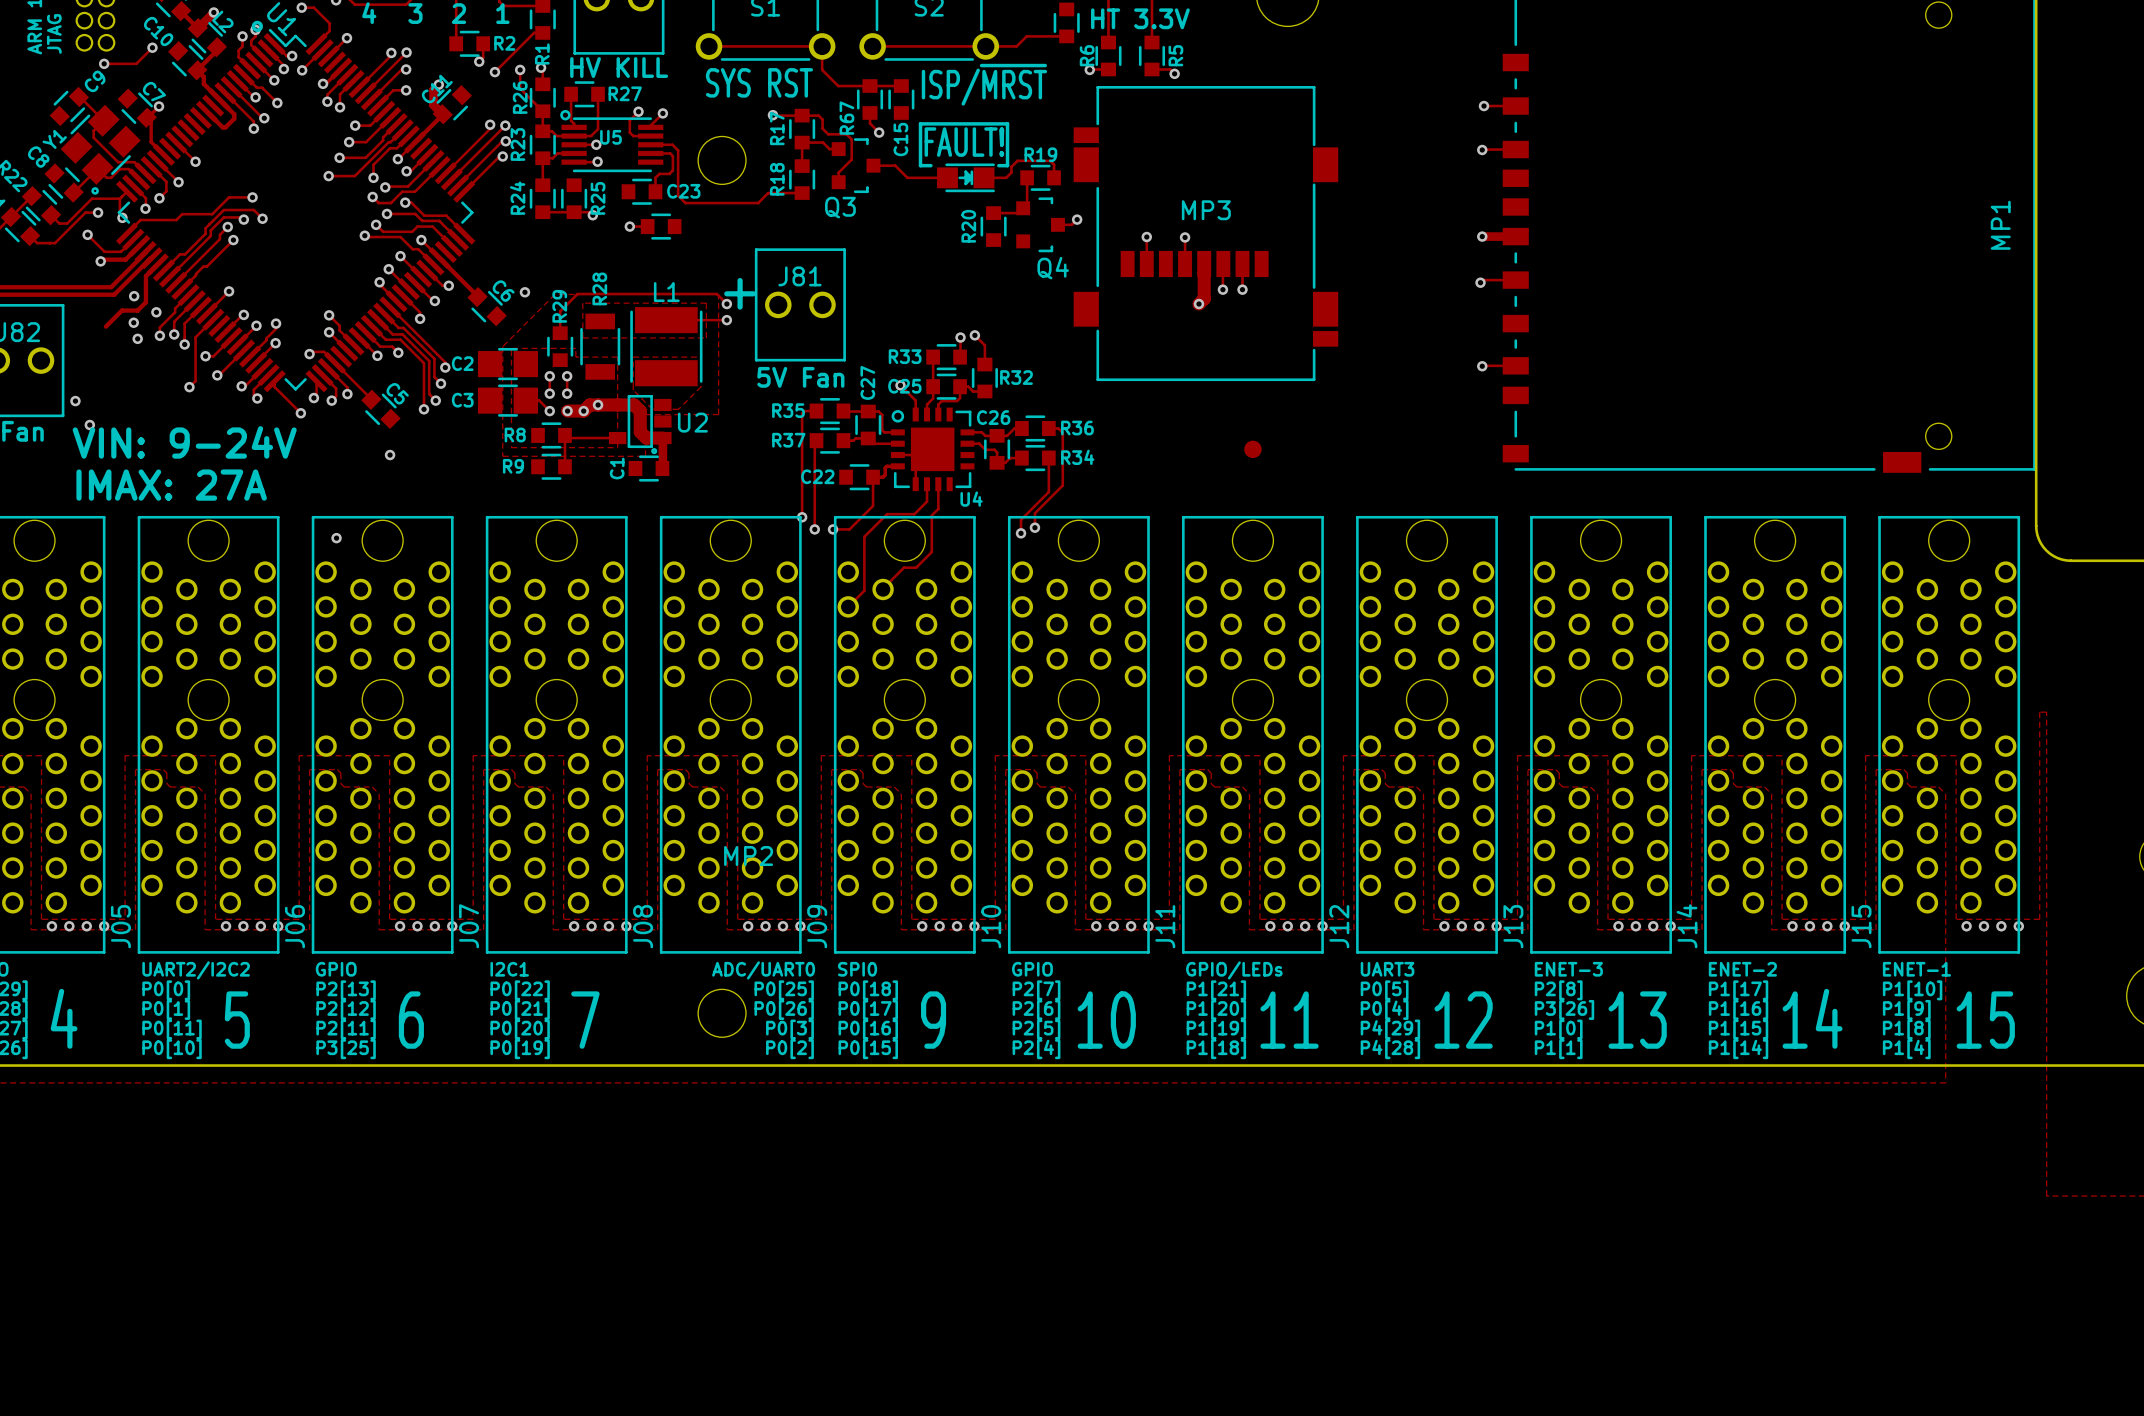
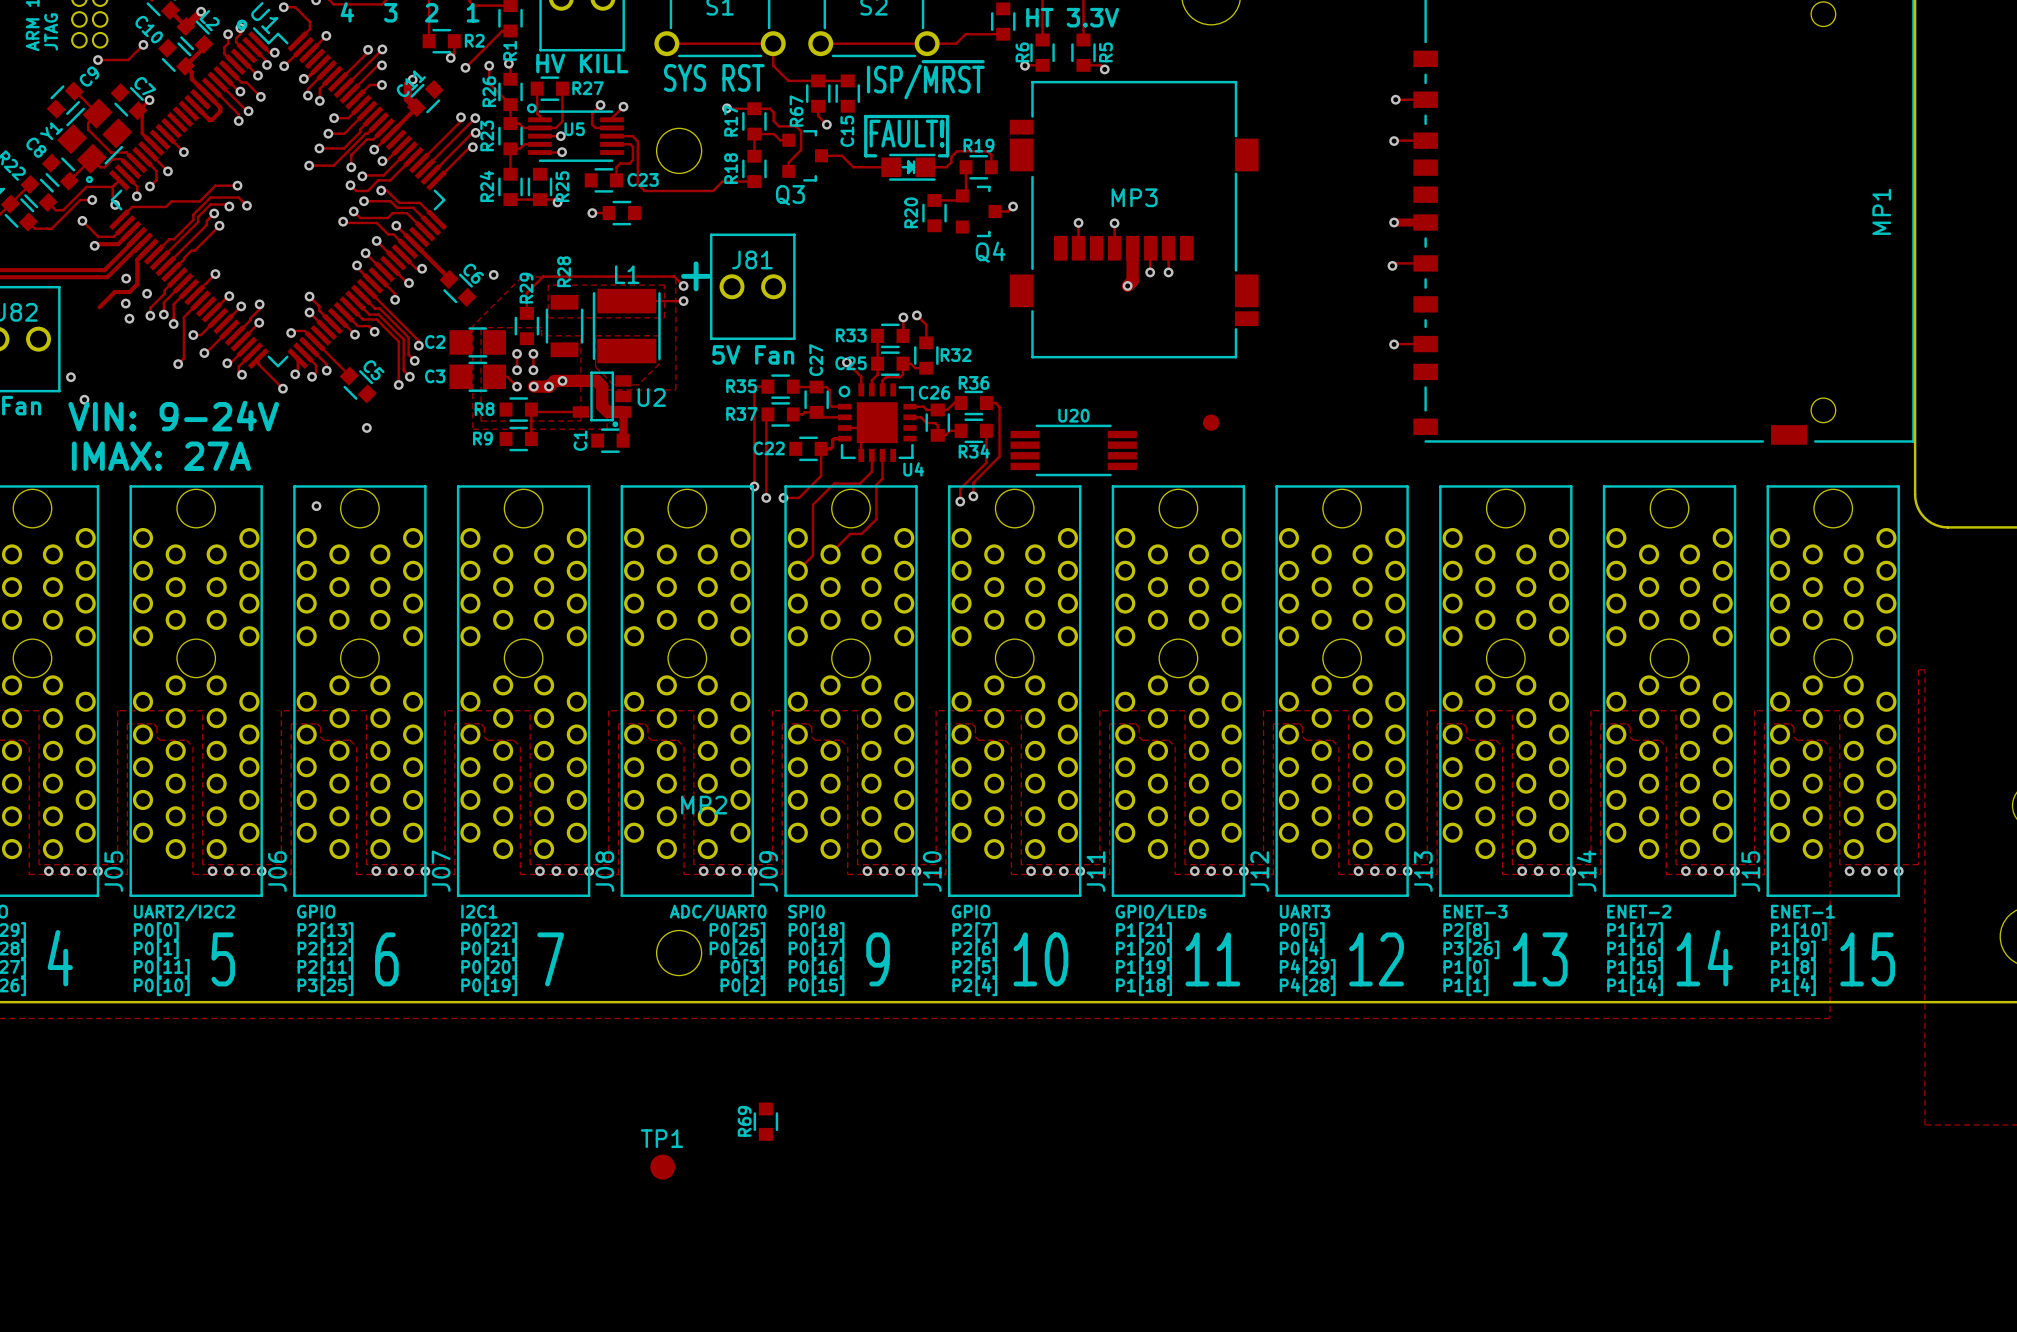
R36 name position: R36 (1077, 428) -> R36 (974, 382)
part position: (1252, 449) -> (1211, 422)
R34 name position: R34 (1077, 457) -> R34 (974, 451)
U20: none -> (1073, 450)
R69: none -> (765, 1121)
TP1: none -> (662, 1167)

